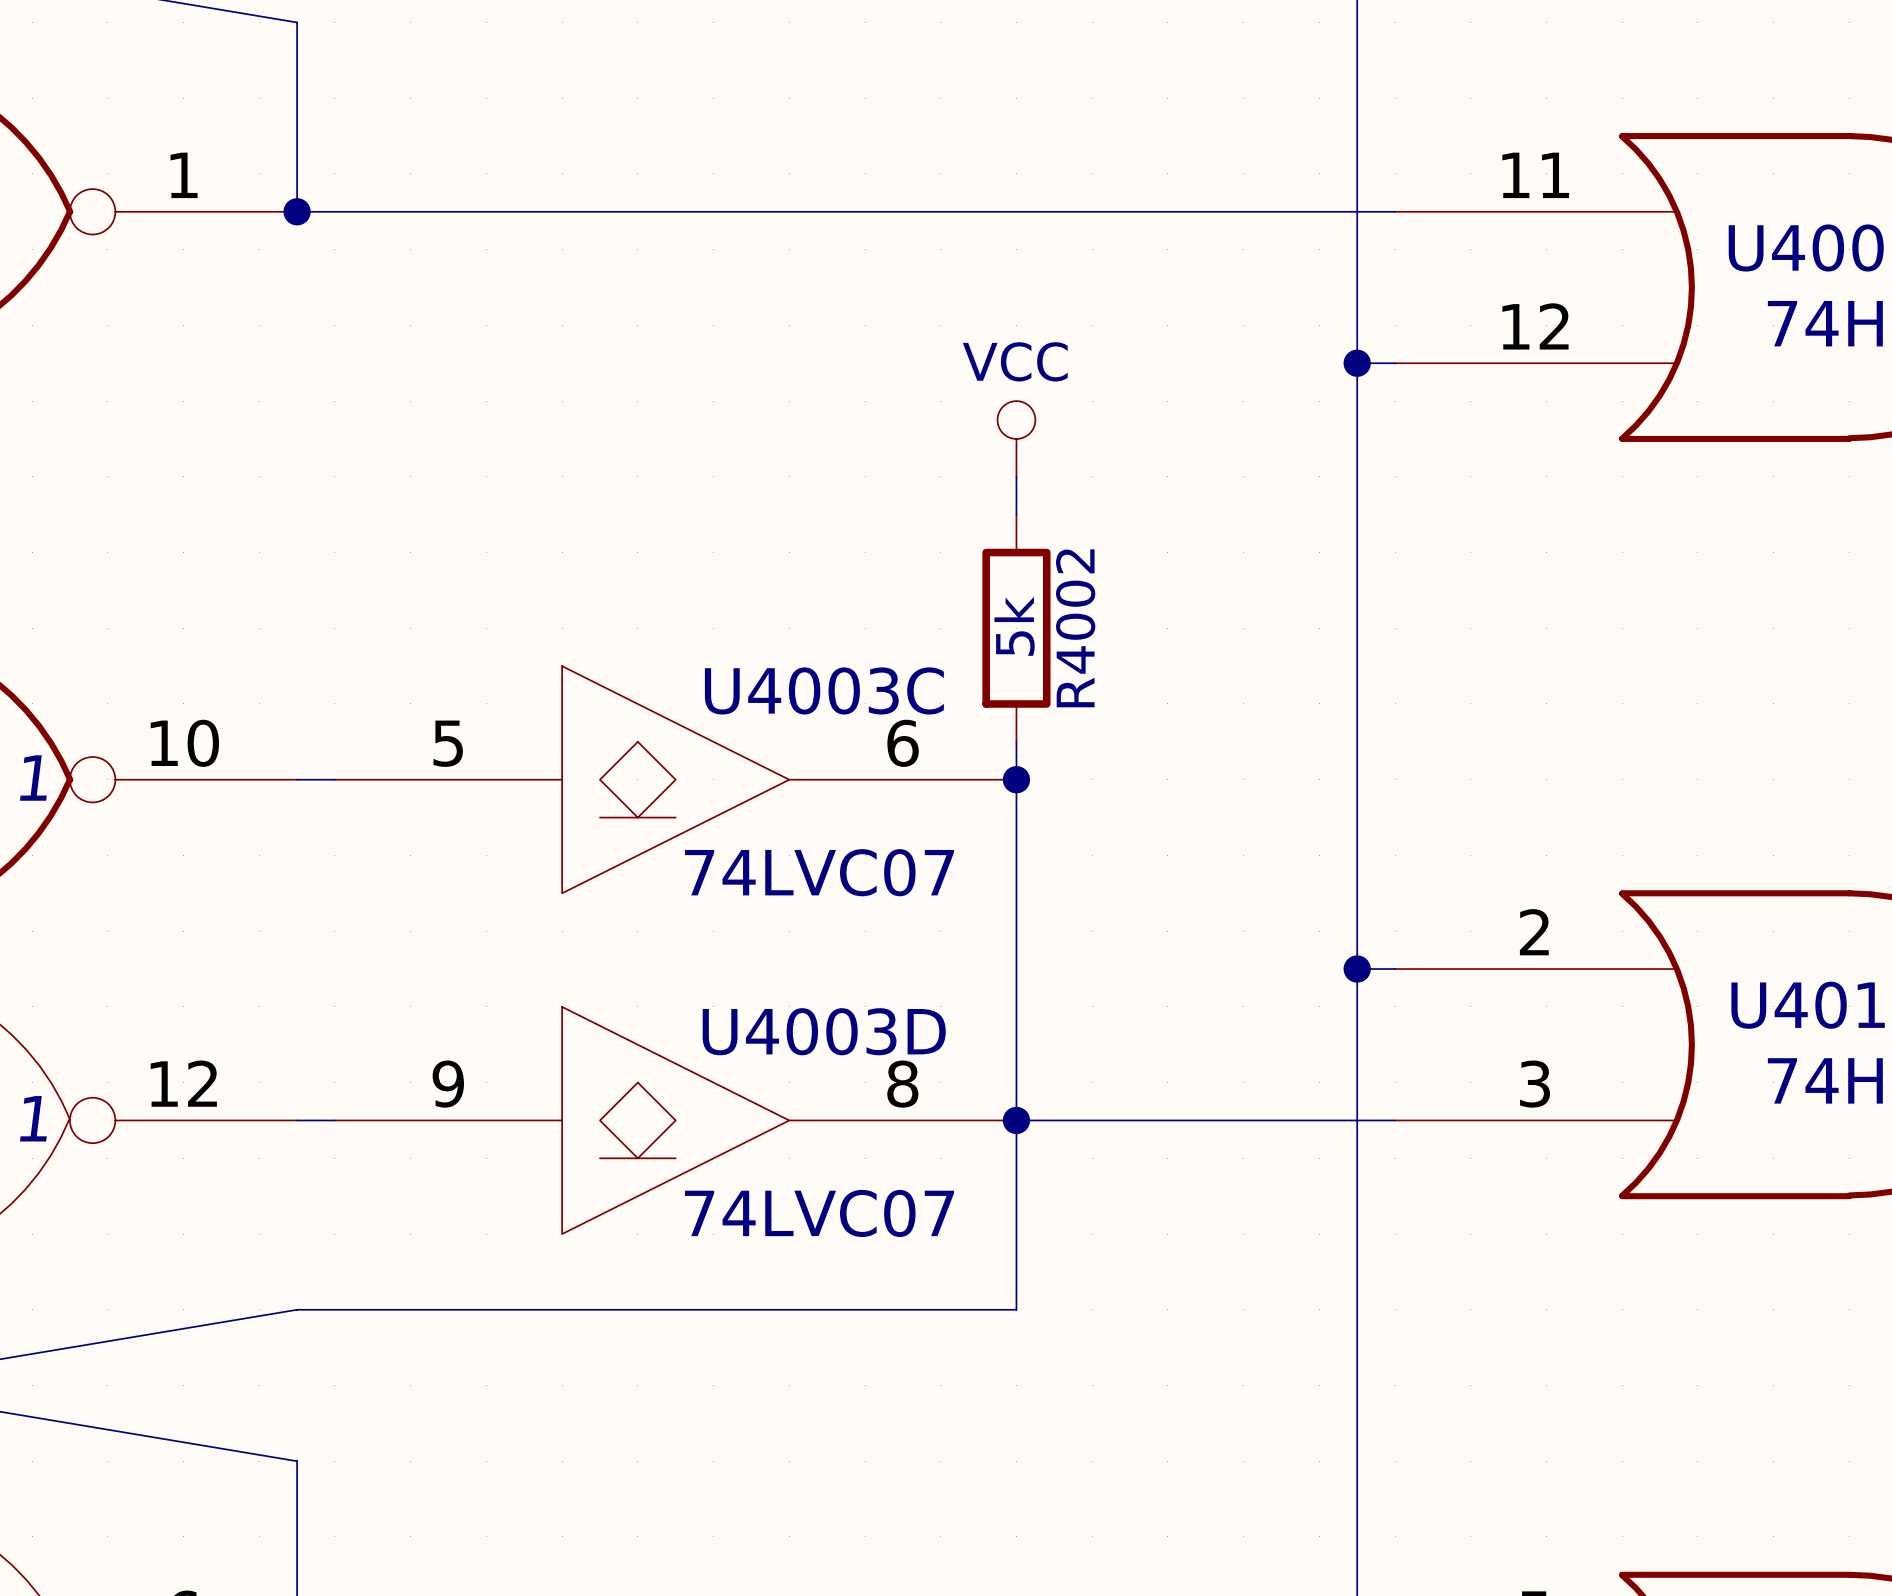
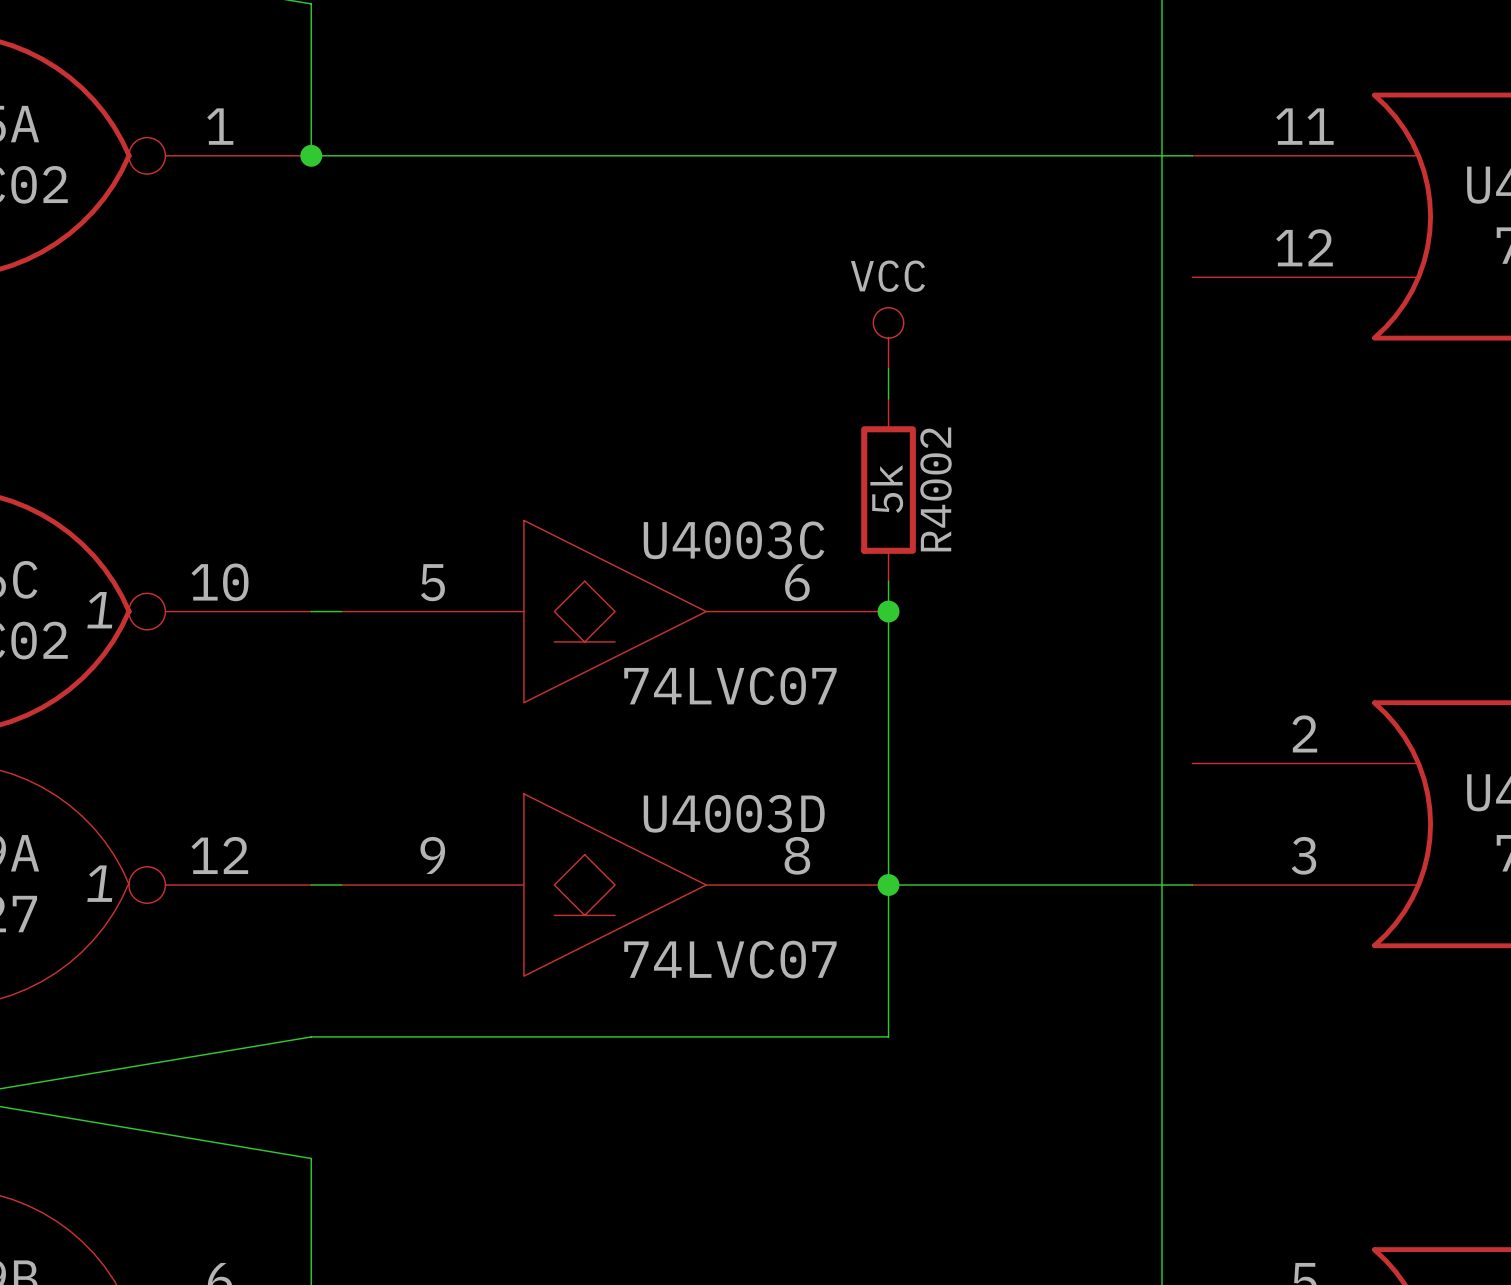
wire: (1357, 363) (1395, 363) -> none
junction: (1357, 363) -> none
wire: (1357, 969) (1395, 969) -> none
junction: (1357, 969) -> none

